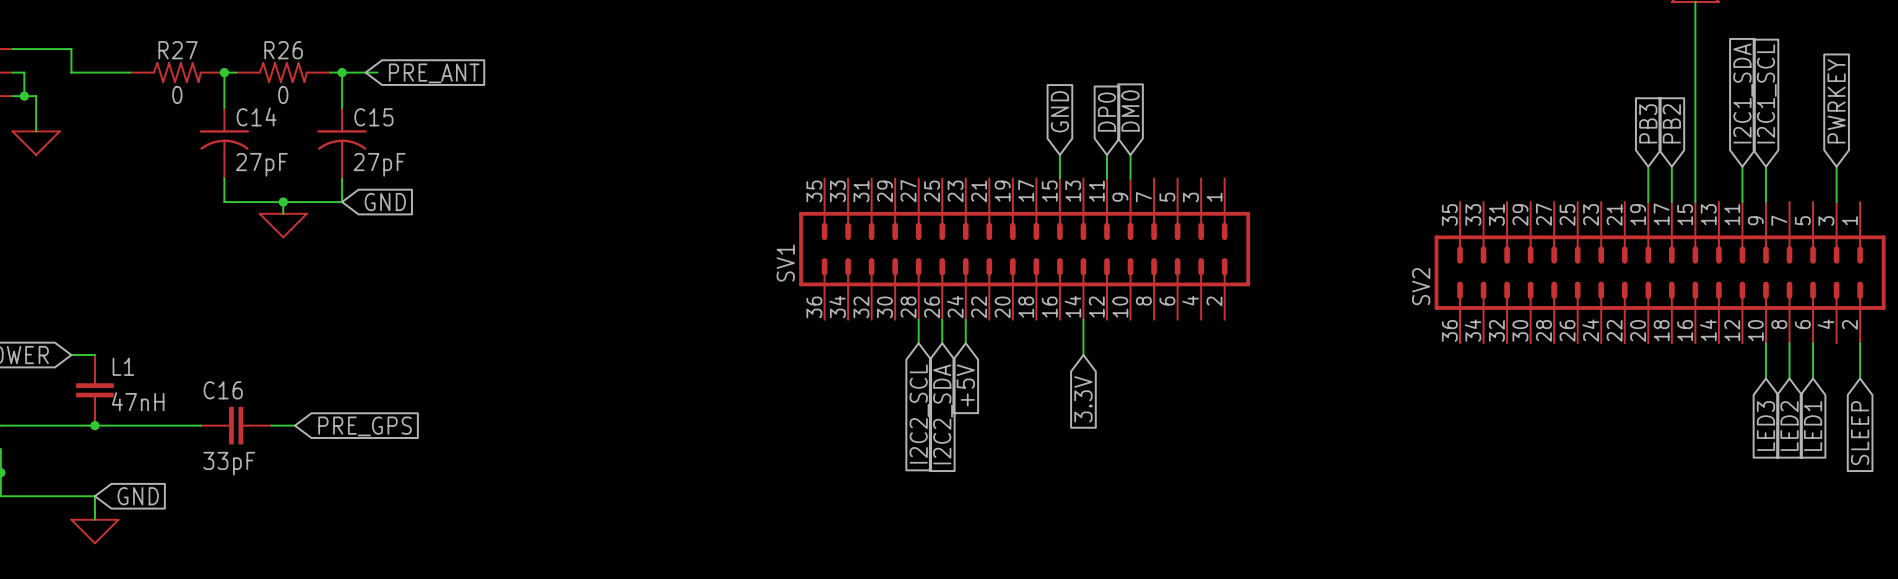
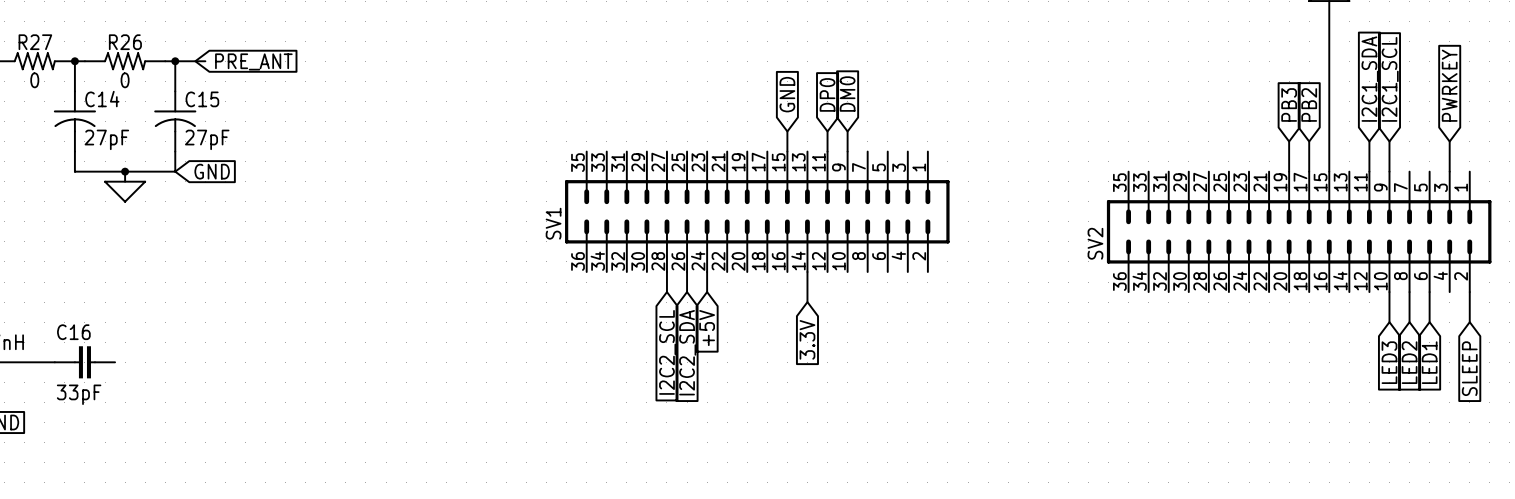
wire: (271, 425) (295, 425) -> none
global label: PRE_GPS (365, 426) -> none

